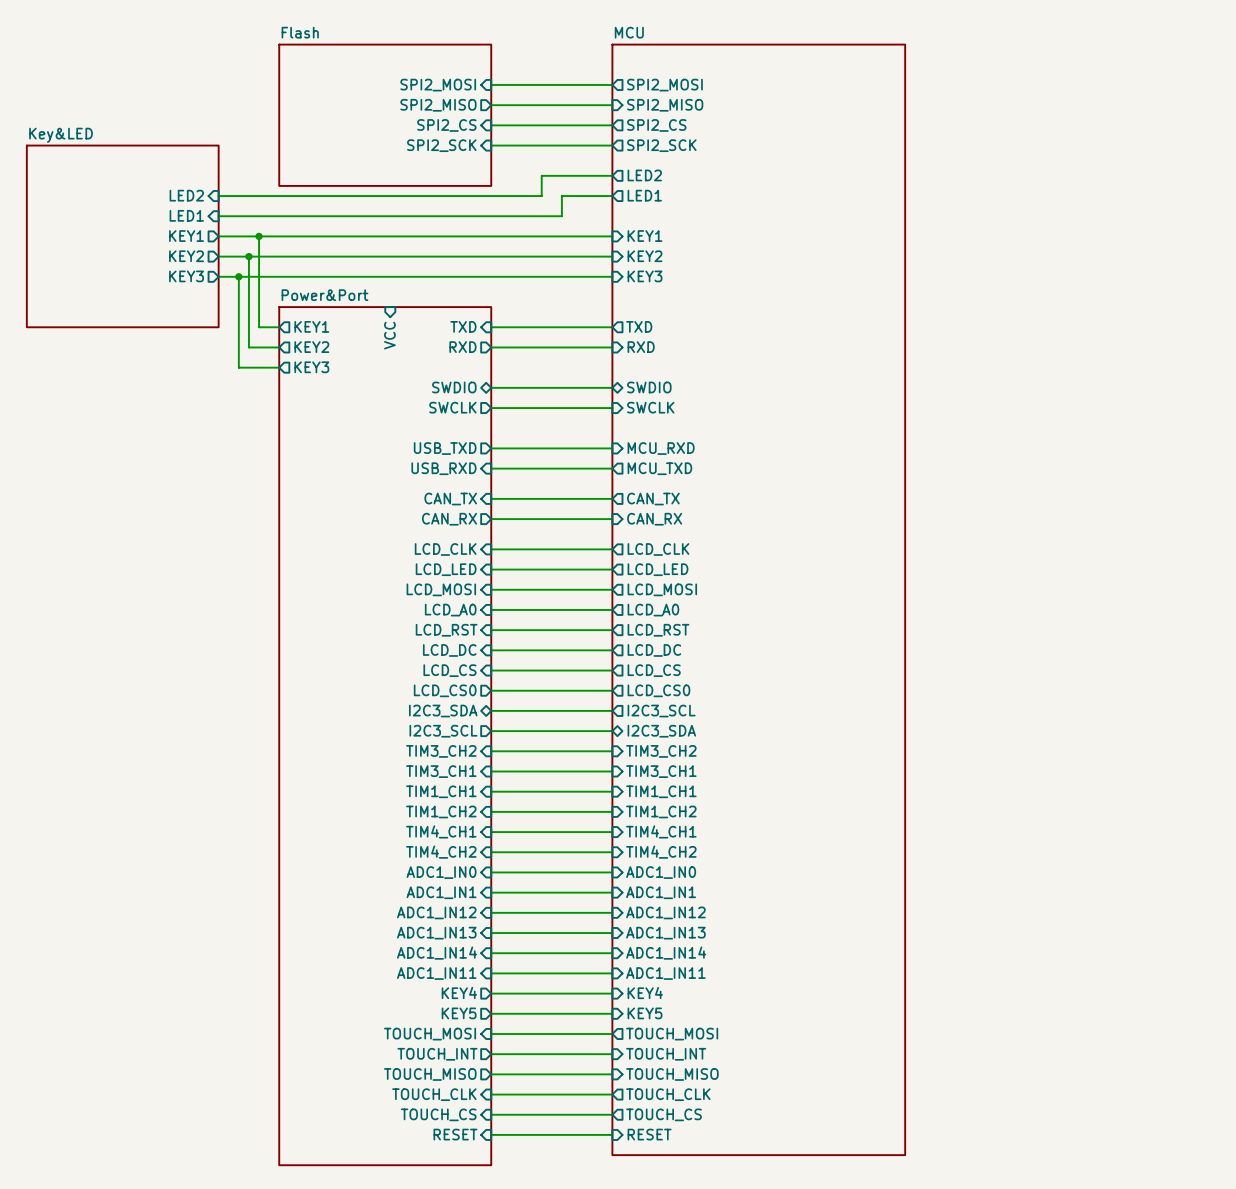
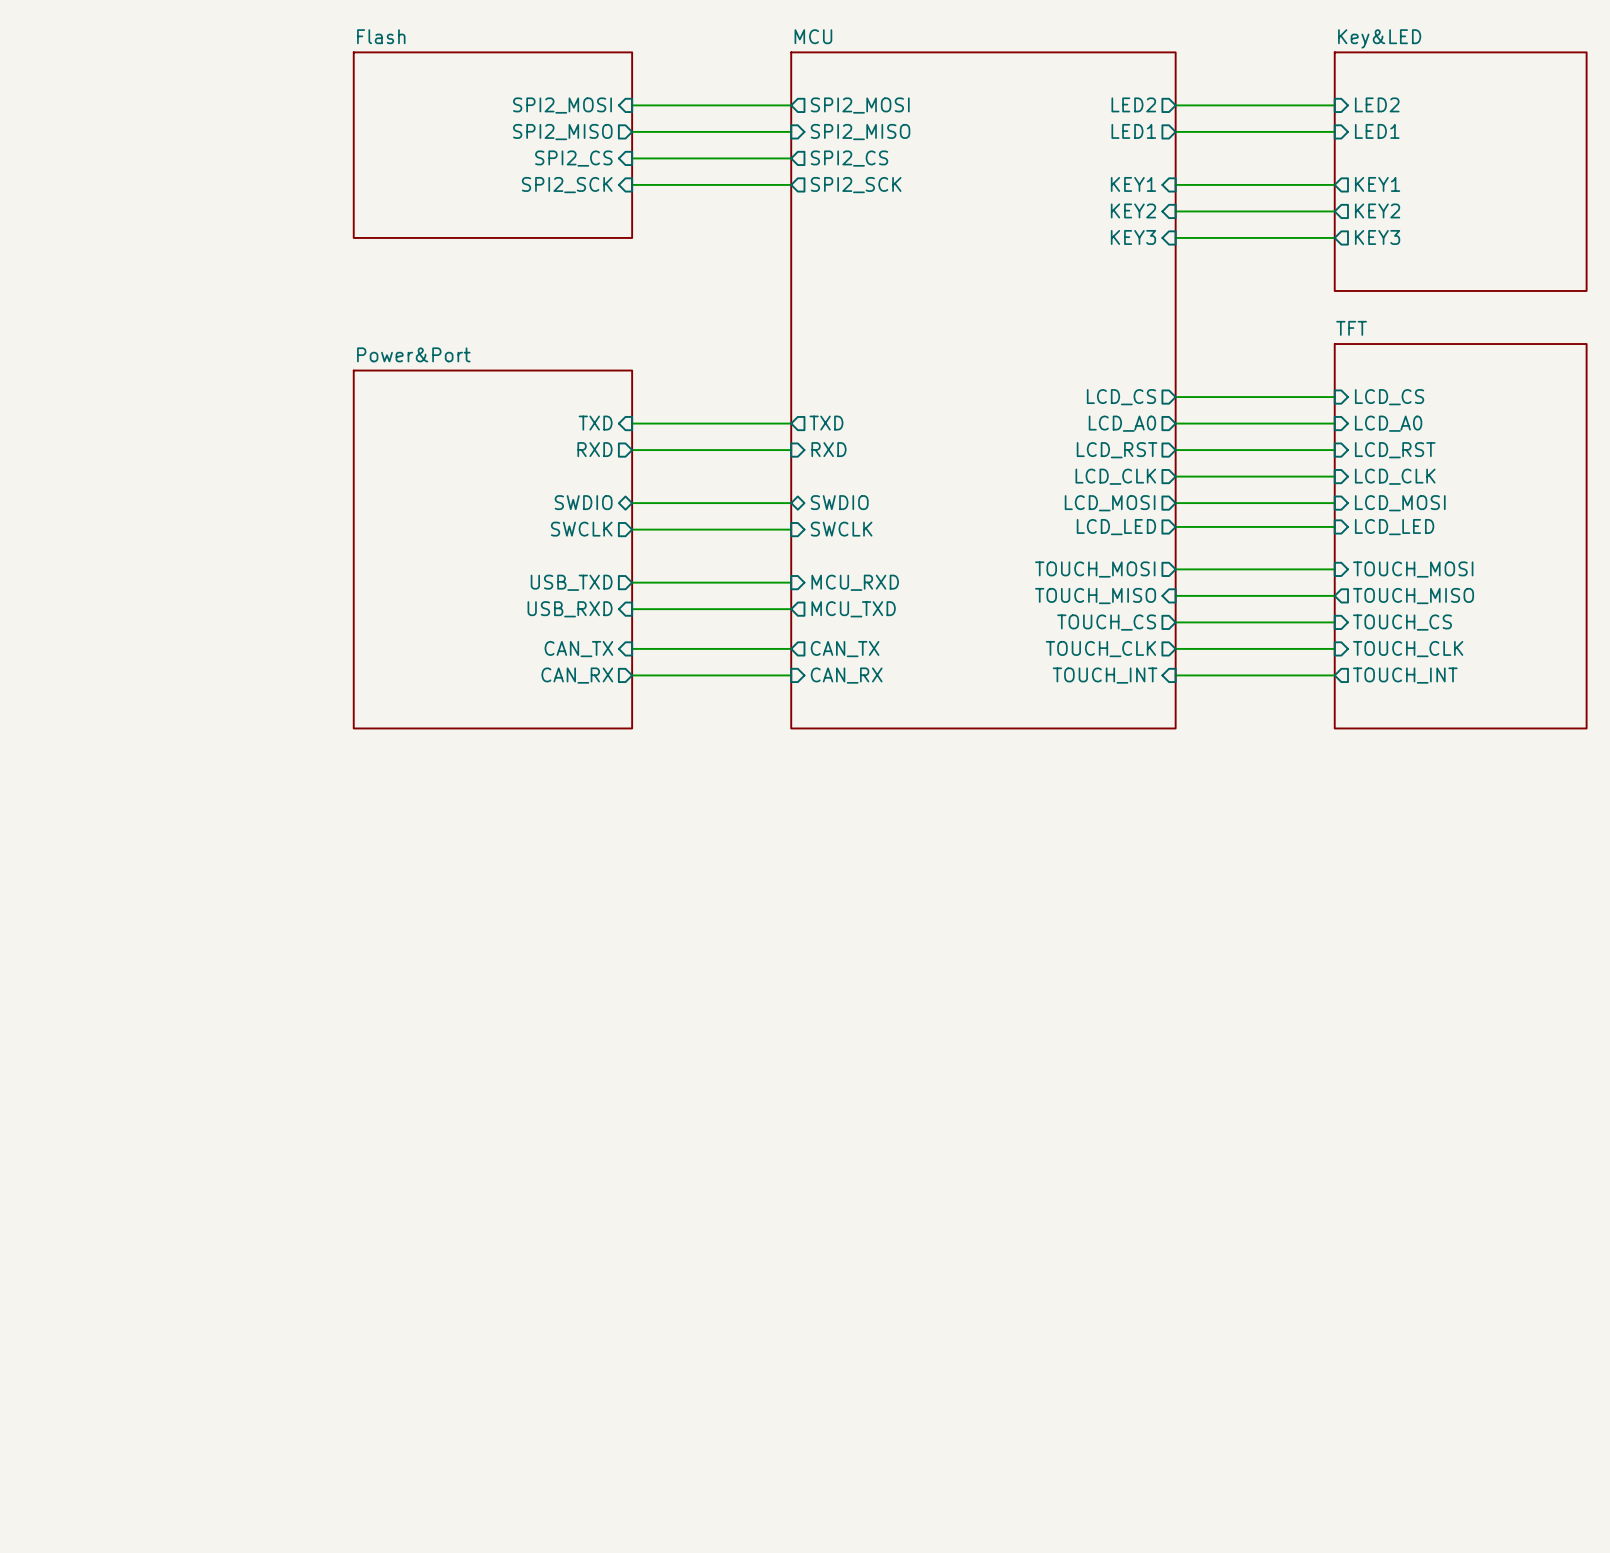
sheet pin: none -> LED2 (1133, 104)
wire: none -> (1175, 105) (1334, 105)
sheet pin: none -> LED2 (1377, 104)
sheet pin: none -> LED1 (1133, 131)
sheet pin: none -> LED1 (1377, 131)
wire: none -> (1175, 131) (1334, 131)
sheet Key&LED: none -> (1460, 171)
sheet pin: none -> KEY1 (1133, 184)
wire: none -> (1175, 184) (1334, 184)
sheet pin: none -> KEY1 (1377, 184)
sheet pin: none -> KEY2 (1133, 210)
wire: none -> (1175, 211) (1334, 211)
sheet pin: none -> KEY2 (1377, 210)
wire: (612, 175) (541, 175) (541, 196) (218, 196) -> none
sheet pin: LED2 (644, 175) -> none
sheet pin: none -> KEY3 (1133, 237)
wire: none -> (1175, 237) (1334, 237)
sheet pin: none -> KEY3 (1377, 237)
sheet pin: LED2 (186, 195) -> none
sheet pin: LED1 (644, 195) -> none
wire: (612, 196) (561, 196) (561, 216) (218, 216) -> none
sheet pin: LED1 (186, 215) -> none
sheet Key&LED: (122, 236) -> none
sheet pin: KEY1 (186, 236) -> none
wire: (218, 236) (612, 236) -> none
wire: (259, 236) (259, 327) (279, 327) -> none
junction: (259, 236) -> none
sheet pin: KEY1 (645, 236) -> none
sheet pin: KEY2 (186, 256) -> none
wire: (218, 256) (612, 256) -> none
wire: (248, 256) (248, 347) (279, 347) -> none
junction: (248, 256) -> none
sheet pin: KEY2 (645, 256) -> none
sheet pin: KEY3 (186, 276) -> none
wire: (218, 276) (612, 276) -> none
wire: (238, 276) (238, 367) (279, 367) -> none
junction: (238, 276) -> none
sheet pin: KEY3 (645, 276) -> none
sheet MCU: none -> (983, 390)
sheet pin: none -> LCD_CS (1121, 397)
wire: none -> (1175, 397) (1334, 397)
sheet pin: none -> LCD_CS (1389, 397)
sheet pin: KEY1 (311, 326) -> none
sheet pin: none -> LCD_A0 (1122, 423)
wire: none -> (1175, 423) (1334, 423)
sheet pin: none -> LCD_A0 (1388, 423)
sheet pin: VCC (389, 335) -> none
sheet pin: KEY2 (311, 347) -> none
sheet pin: none -> LCD_RST (1117, 450)
wire: none -> (1175, 450) (1334, 450)
sheet pin: none -> LCD_RST (1395, 450)
sheet pin: KEY3 (311, 367) -> none
sheet pin: none -> LCD_CLK (1115, 476)
wire: none -> (1175, 476) (1334, 476)
sheet pin: none -> LCD_CLK (1395, 476)
sheet pin: none -> LCD_MOSI (1110, 503)
wire: none -> (1175, 503) (1334, 503)
sheet pin: none -> LCD_MOSI (1400, 503)
sheet pin: none -> LCD_LED (1116, 527)
wire: none -> (1175, 526) (1334, 526)
sheet pin: none -> LCD_LED (1394, 527)
sheet TFT: none -> (1460, 536)
sheet Power&Port: none -> (492, 549)
sheet pin: none -> TOUCH_MOSI (1095, 569)
wire: none -> (1175, 569) (1334, 569)
sheet pin: none -> TOUCH_MOSI (1413, 569)
sheet pin: none -> TOUCH_MISO (1095, 596)
wire: none -> (1175, 595) (1334, 595)
sheet pin: none -> TOUCH_MISO (1413, 596)
sheet pin: none -> TOUCH_CS (1106, 622)
wire: none -> (1175, 622) (1334, 622)
sheet pin: none -> TOUCH_CS (1402, 622)
wire: none -> (1175, 648) (1334, 648)
sheet pin: none -> TOUCH_CLK (1100, 649)
sheet pin: none -> TOUCH_CLK (1408, 649)
sheet pin: none -> TOUCH_INT (1105, 675)
wire: none -> (1175, 675) (1334, 675)
sheet pin: none -> TOUCH_INT (1405, 675)
sheet pin: LCD_CLK (445, 549) -> none
wire: (491, 549) (612, 549) -> none
sheet pin: LCD_CLK (658, 549) -> none
sheet pin: LCD_LED (446, 569) -> none
wire: (491, 569) (612, 569) -> none
sheet pin: LCD_LED (657, 569) -> none
sheet pin: LCD_MOSI (441, 589) -> none
wire: (491, 589) (612, 589) -> none
sheet pin: LCD_MOSI (662, 589) -> none
sheet MCU: (758, 599) -> none
wire: (491, 609) (612, 609) -> none
sheet pin: LCD_A0 (450, 610) -> none
sheet pin: LCD_A0 (653, 610) -> none
sheet pin: LCD_RST (446, 630) -> none
wire: (491, 630) (612, 630) -> none
sheet pin: LCD_RST (658, 630) -> none
sheet pin: LCD_DC (449, 650) -> none
wire: (491, 650) (612, 650) -> none
sheet pin: LCD_DC (654, 650) -> none
sheet pin: LCD_CS (449, 670) -> none
wire: (491, 670) (612, 670) -> none
sheet pin: LCD_CS (654, 670) -> none
sheet pin: LCD_CS0 (445, 690) -> none
wire: (491, 690) (612, 690) -> none
sheet pin: LCD_CS0 (658, 690) -> none
wire: (491, 710) (612, 710) -> none
sheet pin: I2C3_SDA (443, 711) -> none
sheet pin: I2C3_SCL (661, 711) -> none
sheet pin: I2C3_SCL (443, 731) -> none
wire: (491, 731) (612, 731) -> none
sheet pin: I2C3_SDA (661, 731) -> none
sheet Power&Port: (385, 736) -> none
sheet pin: TIM3_CH2 (441, 751) -> none
wire: (491, 751) (612, 751) -> none
sheet pin: TIM3_CH2 (661, 751) -> none
sheet pin: TIM3_CH1 (441, 771) -> none
wire: (491, 771) (612, 771) -> none
sheet pin: TIM3_CH1 (661, 771) -> none
sheet pin: TIM1_CH1 (441, 791) -> none
wire: (491, 791) (612, 791) -> none
sheet pin: TIM1_CH1 (661, 791) -> none
sheet pin: TIM1_CH2 (441, 811) -> none
wire: (491, 811) (612, 811) -> none
sheet pin: TIM1_CH2 (661, 811) -> none
sheet pin: TIM4_CH1 (441, 831) -> none
sheet pin: TIM4_CH1 (661, 831) -> none
wire: (491, 832) (612, 832) -> none
sheet pin: TIM4_CH2 (441, 852) -> none
wire: (491, 852) (612, 852) -> none
sheet pin: TIM4_CH2 (661, 852) -> none
sheet pin: ADC1_IN0 (441, 872) -> none
wire: (491, 872) (612, 872) -> none
sheet pin: ADC1_IN0 (661, 872) -> none
sheet pin: ADC1_IN1 (441, 892) -> none
wire: (491, 892) (612, 892) -> none
sheet pin: ADC1_IN1 (661, 892) -> none
sheet pin: ADC1_IN12 (436, 912) -> none
wire: (491, 912) (612, 912) -> none
sheet pin: ADC1_IN12 (665, 912) -> none
sheet pin: ADC1_IN13 (436, 933) -> none
wire: (491, 933) (612, 933) -> none
sheet pin: ADC1_IN13 (665, 933) -> none
sheet pin: ADC1_IN14 (437, 953) -> none
wire: (491, 953) (612, 953) -> none
sheet pin: ADC1_IN14 (666, 953) -> none
sheet pin: ADC1_IN11 (436, 973) -> none
wire: (491, 973) (612, 973) -> none
sheet pin: ADC1_IN11 (665, 973) -> none
sheet pin: KEY4 (459, 992) -> none
sheet pin: KEY4 (645, 992) -> none
wire: (491, 993) (612, 993) -> none
sheet pin: KEY5 (459, 1013) -> none
wire: (491, 1013) (612, 1013) -> none
sheet pin: KEY5 (645, 1013) -> none
wire: (491, 1033) (612, 1033) -> none
sheet pin: TOUCH_MOSI (430, 1034) -> none
sheet pin: TOUCH_MOSI (672, 1034) -> none
sheet pin: TOUCH_INT (437, 1054) -> none
wire: (491, 1054) (612, 1054) -> none
sheet pin: TOUCH_INT (666, 1054) -> none
sheet pin: TOUCH_MISO (430, 1074) -> none
wire: (491, 1074) (612, 1074) -> none
sheet pin: TOUCH_MISO (672, 1074) -> none
sheet pin: TOUCH_CLK (434, 1094) -> none
wire: (491, 1094) (612, 1094) -> none
sheet pin: TOUCH_CLK (668, 1094) -> none
sheet pin: TOUCH_CS (438, 1114) -> none
wire: (491, 1114) (612, 1114) -> none
sheet pin: TOUCH_CS (663, 1114) -> none
sheet pin: RESET (455, 1134) -> none
wire: (491, 1134) (612, 1134) -> none
sheet pin: RESET (649, 1134) -> none

